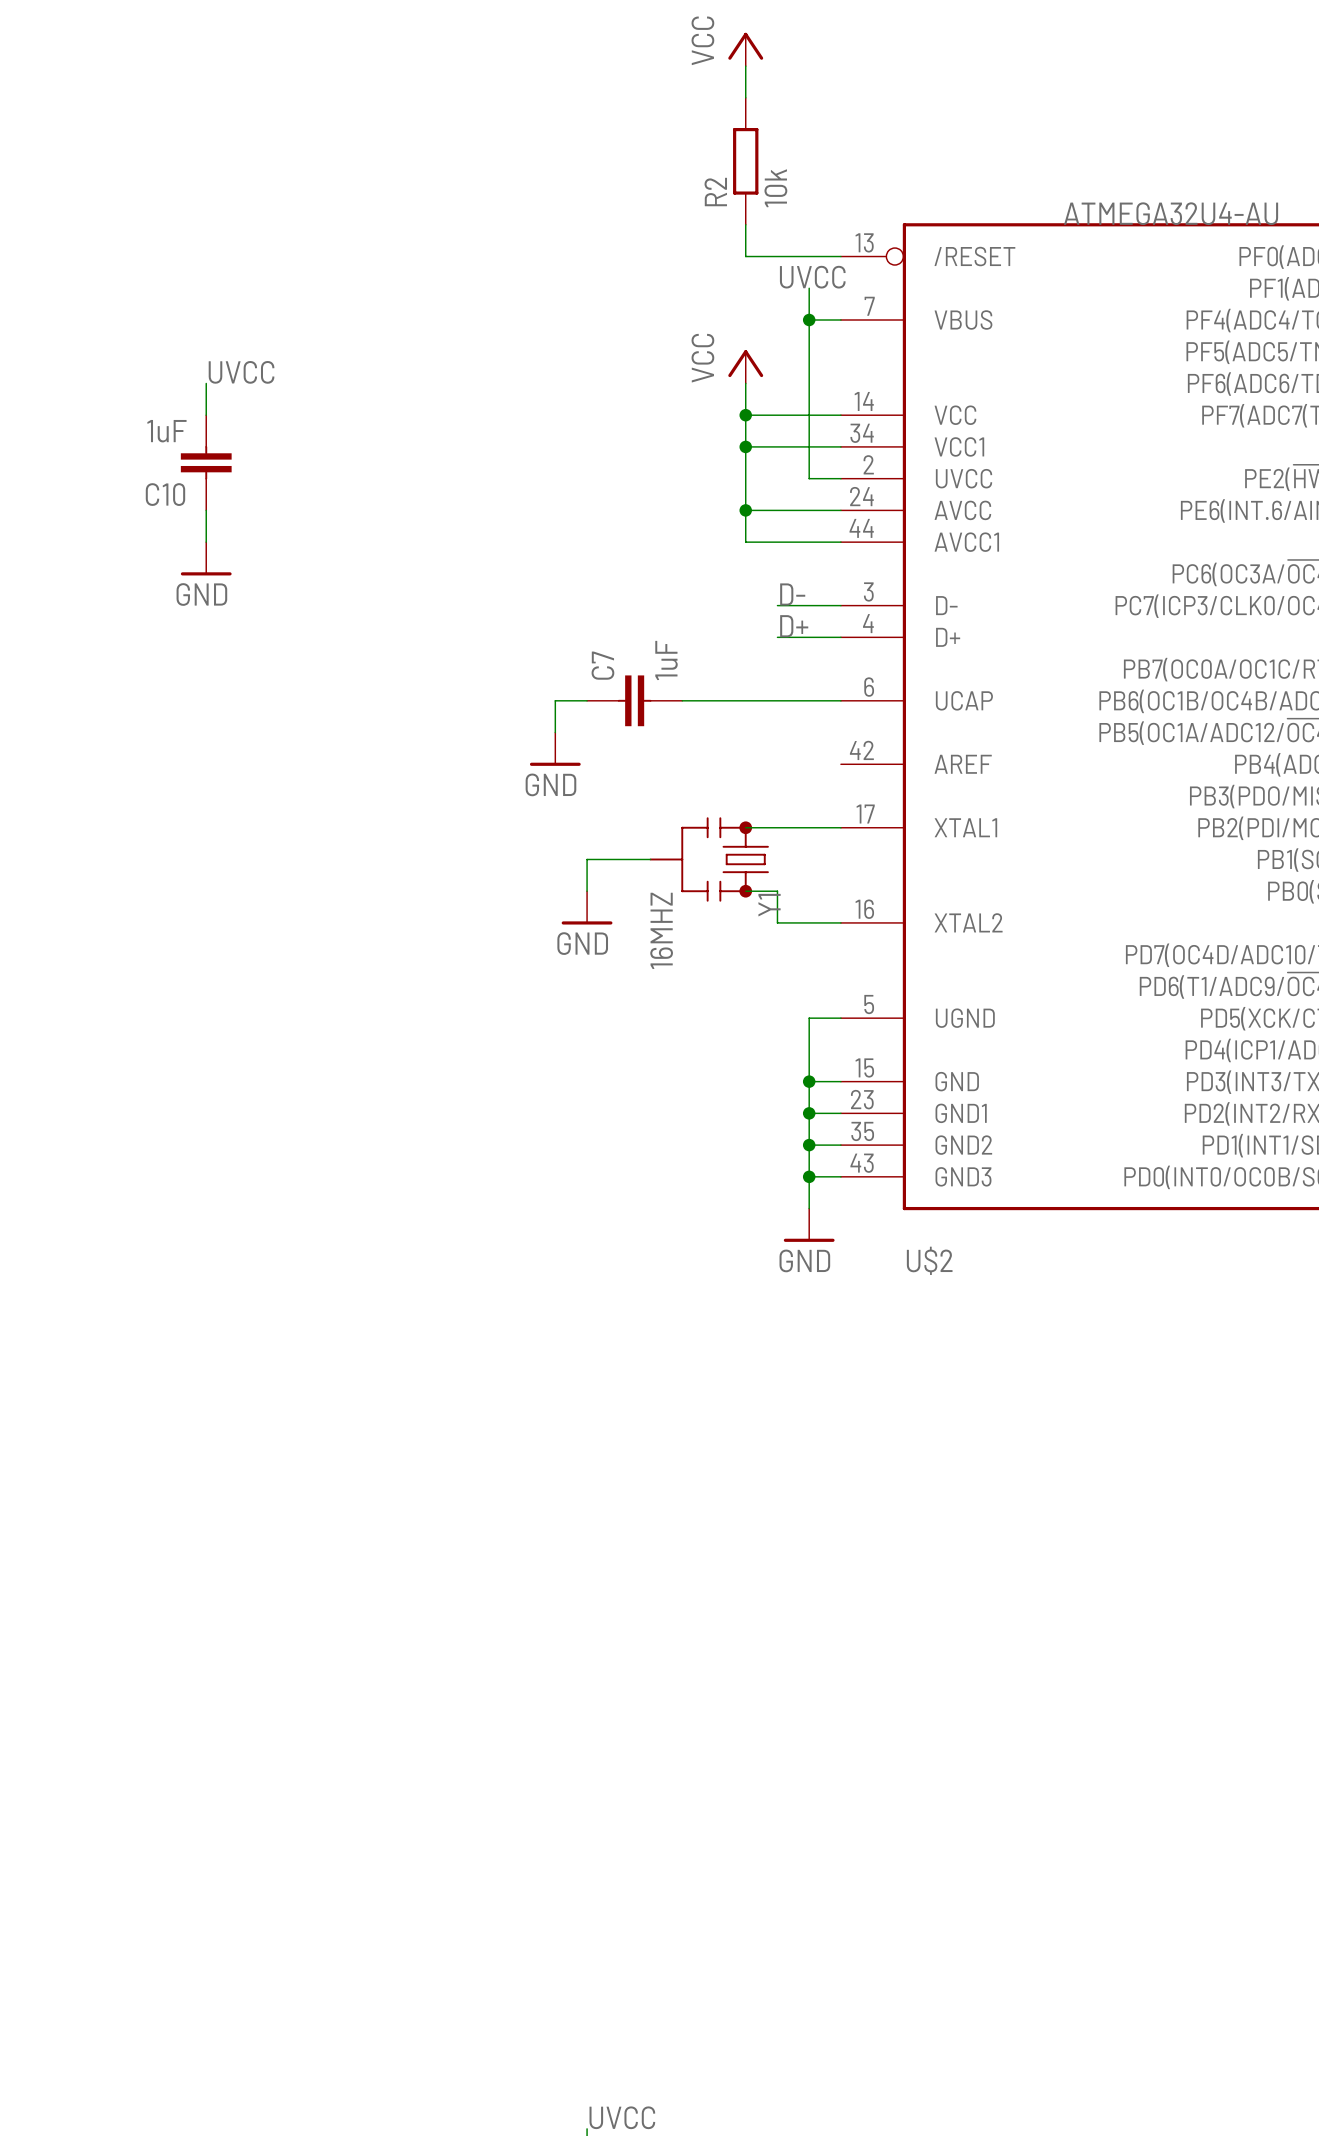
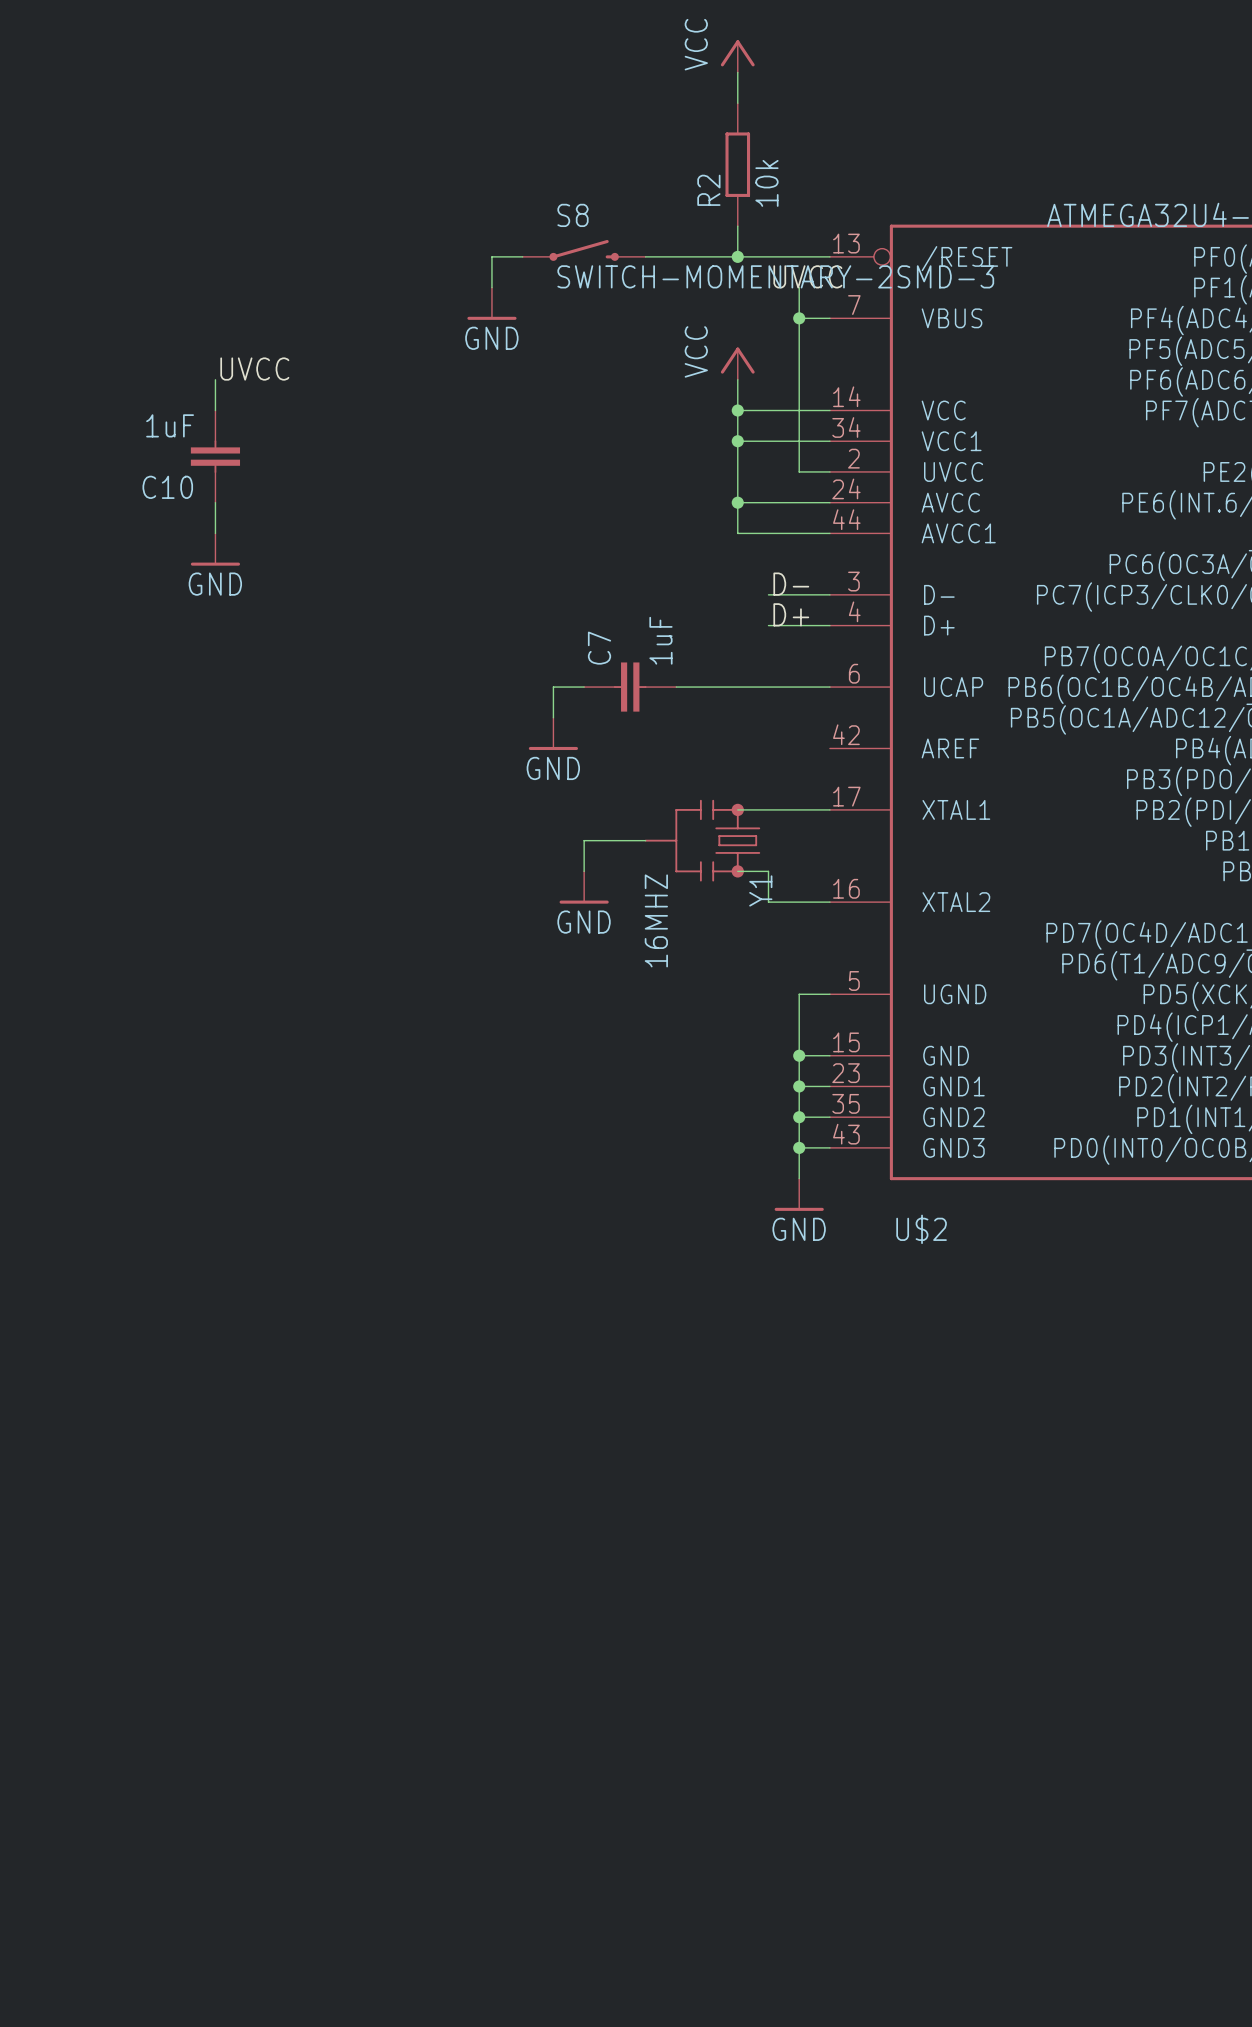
S8: none -> SWITCH-MOMENTARY-2SMD-3 (584, 250)
wire: none -> (522, 256) (491, 256) (491, 287)
wire: none -> (645, 256) (737, 256)
junction: none -> (737, 256)
power symbol: none -> GND (491, 303)

